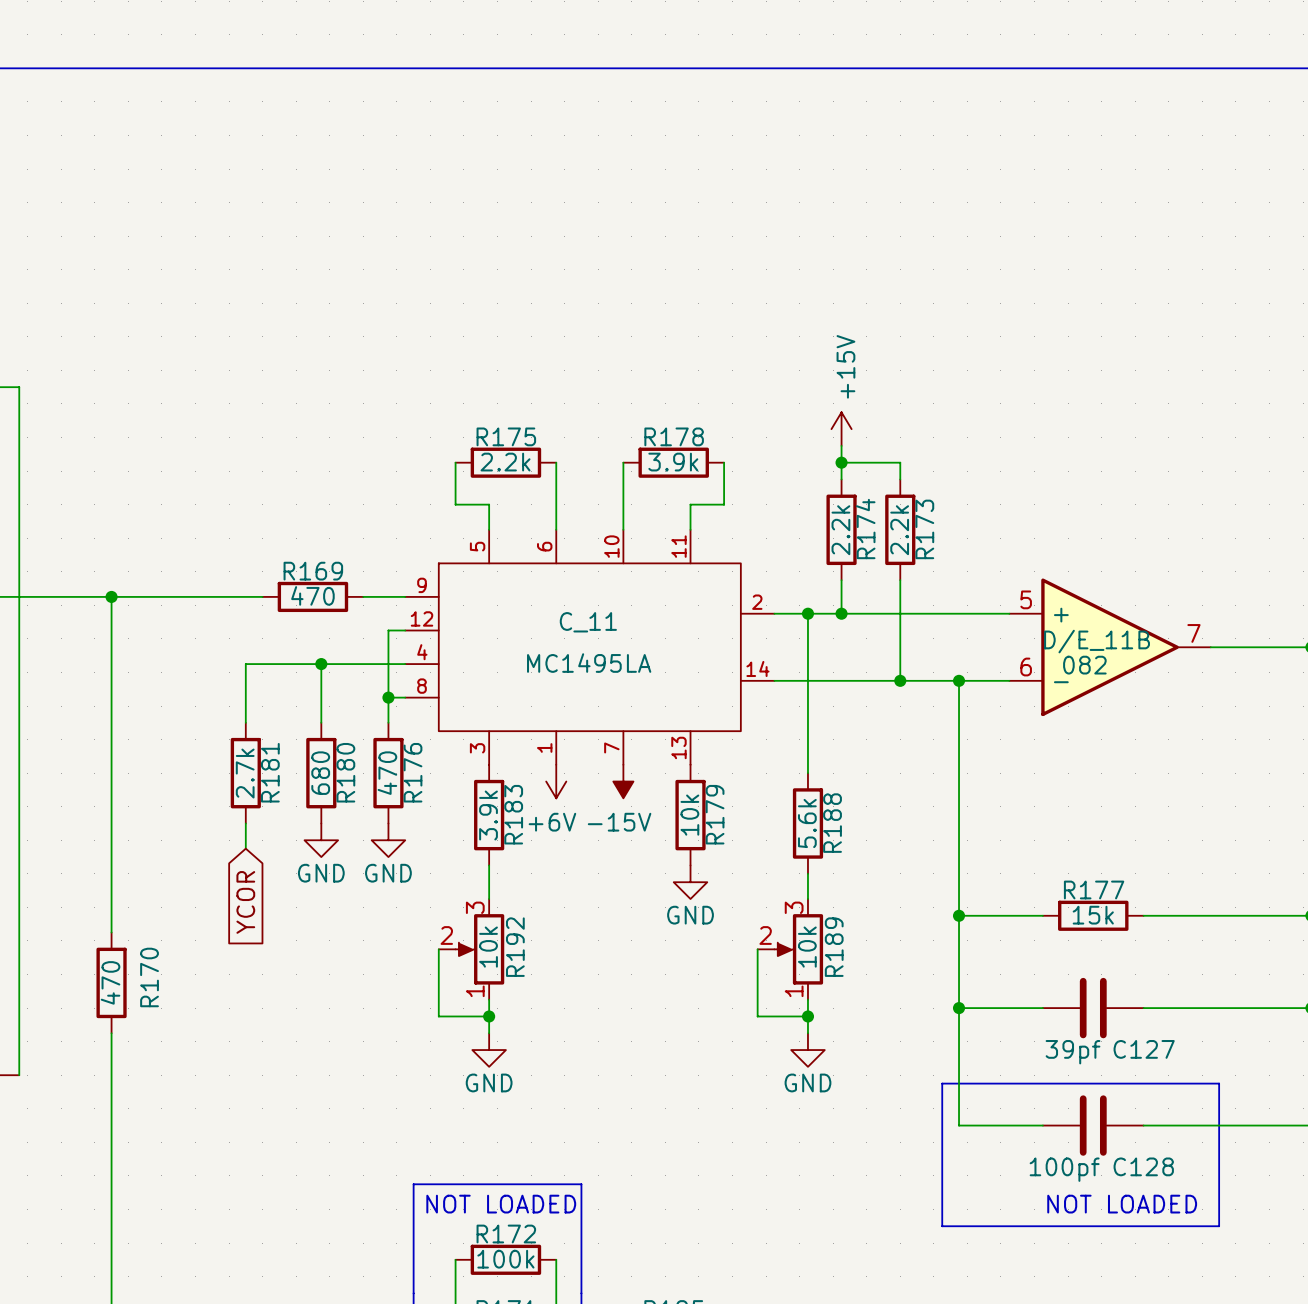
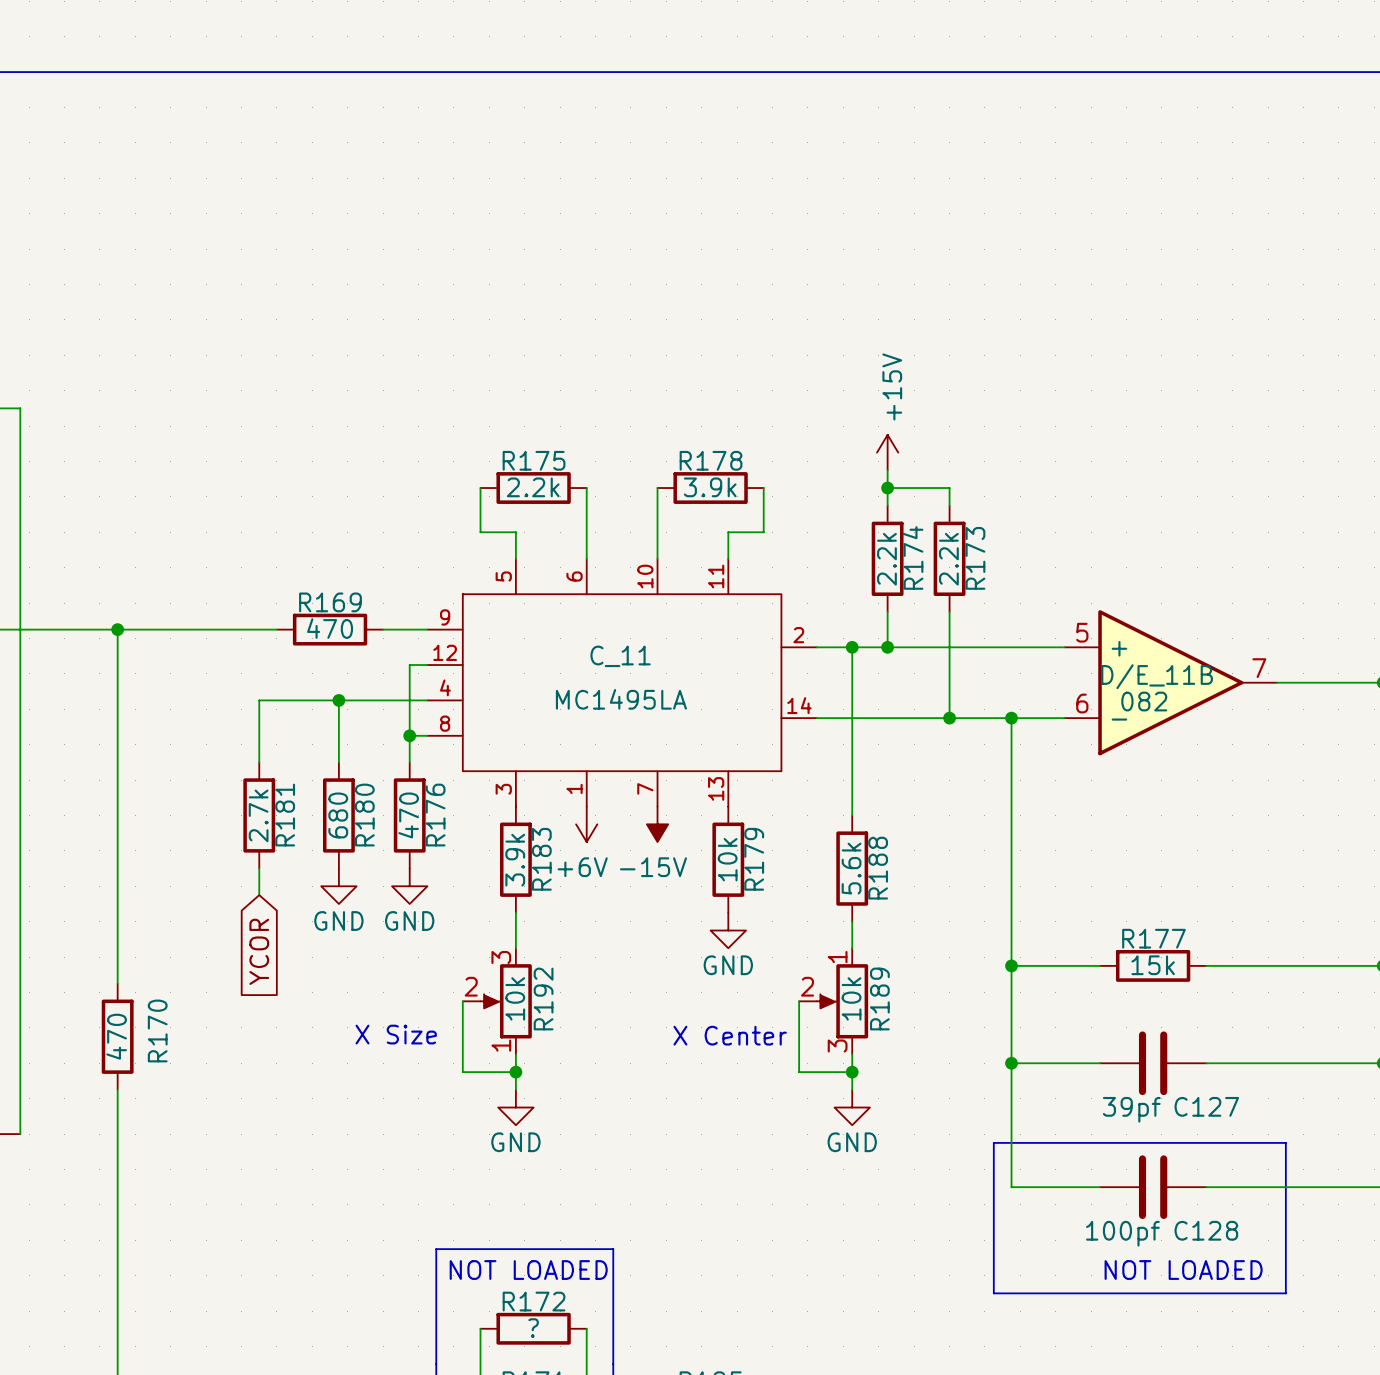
R189 pin number: 3 (794, 907) -> 1 (837, 957)
text: none -> X Size (396, 1034)
text: none -> X Center (730, 1035)
R189 pin number: 1 (794, 991) -> 3 (837, 1045)
R172 value: 100k (505, 1259) -> ? (533, 1328)

